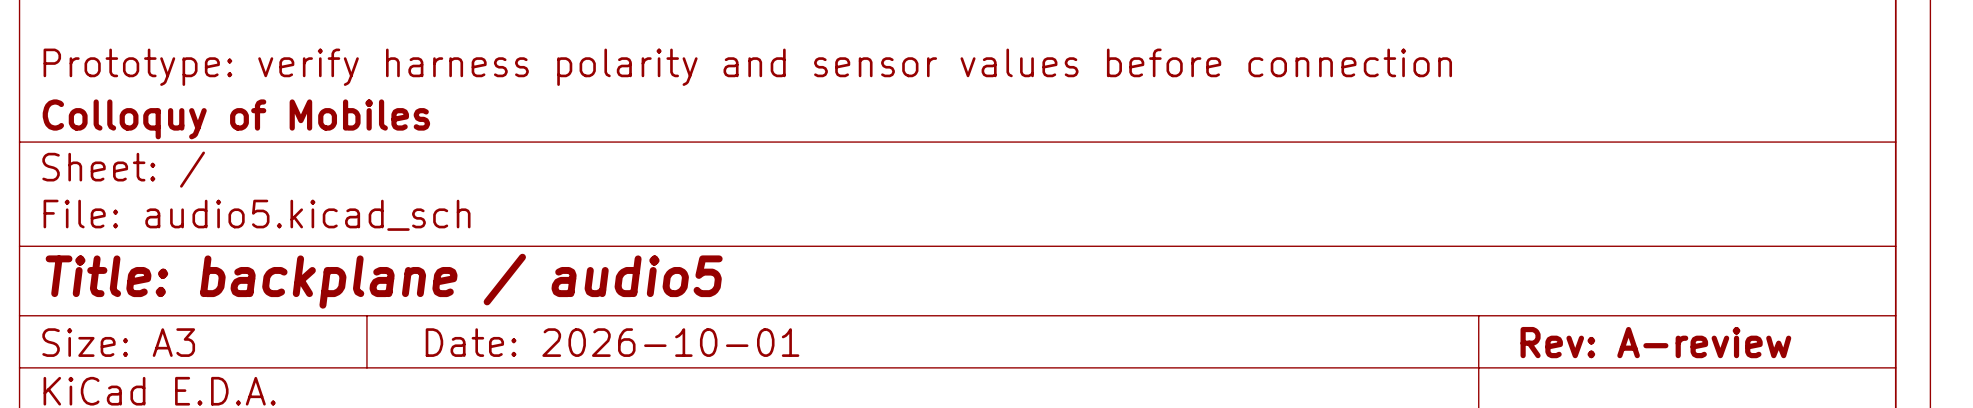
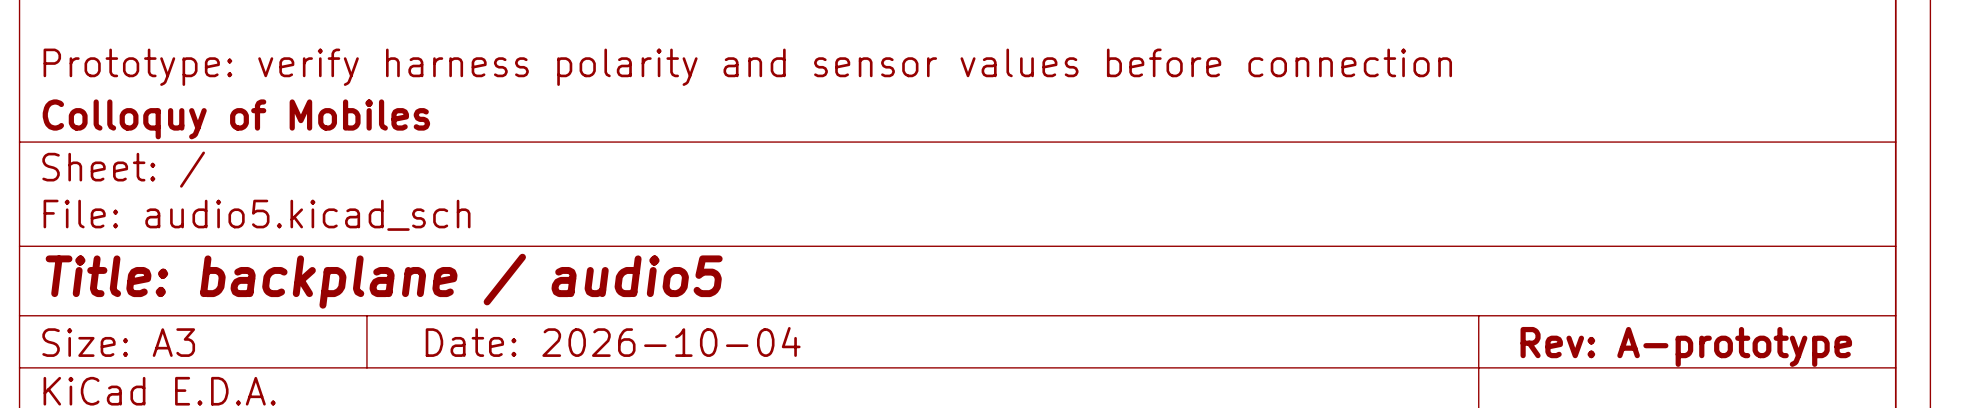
title block: Date: 2026-10-01 (612, 342) -> Date: 2026-10-04 (613, 341)
title block: Rev: A-review (1655, 342) -> Rev: A-prototype (1686, 346)

